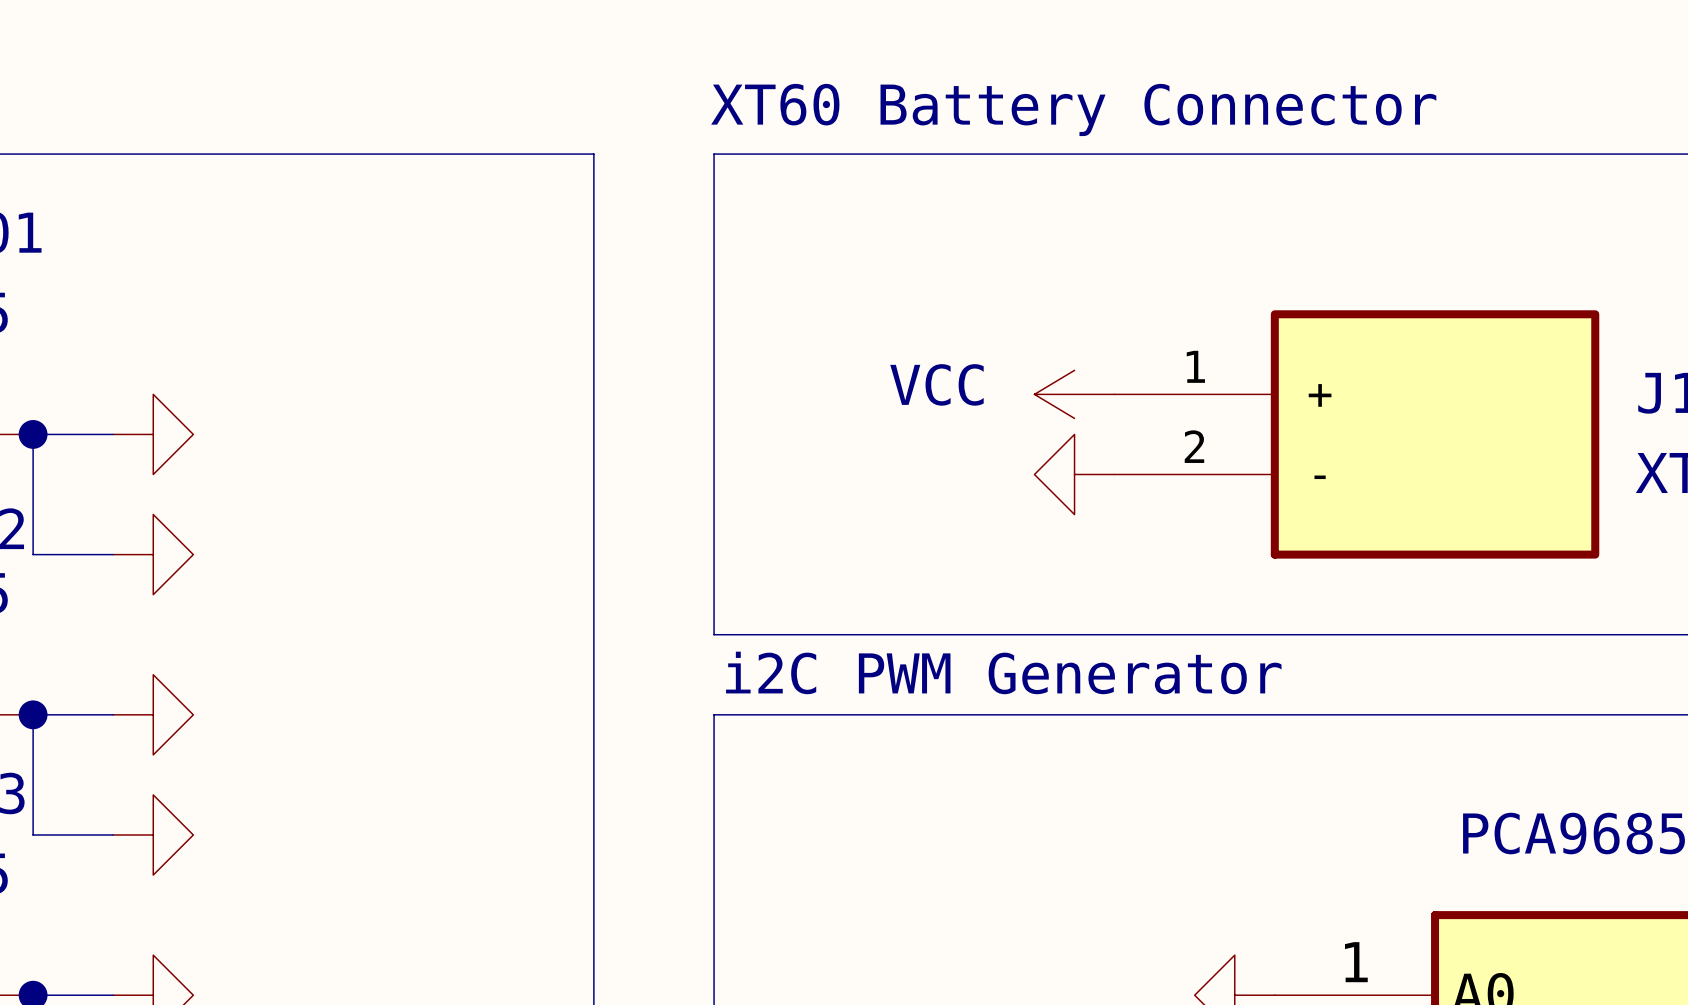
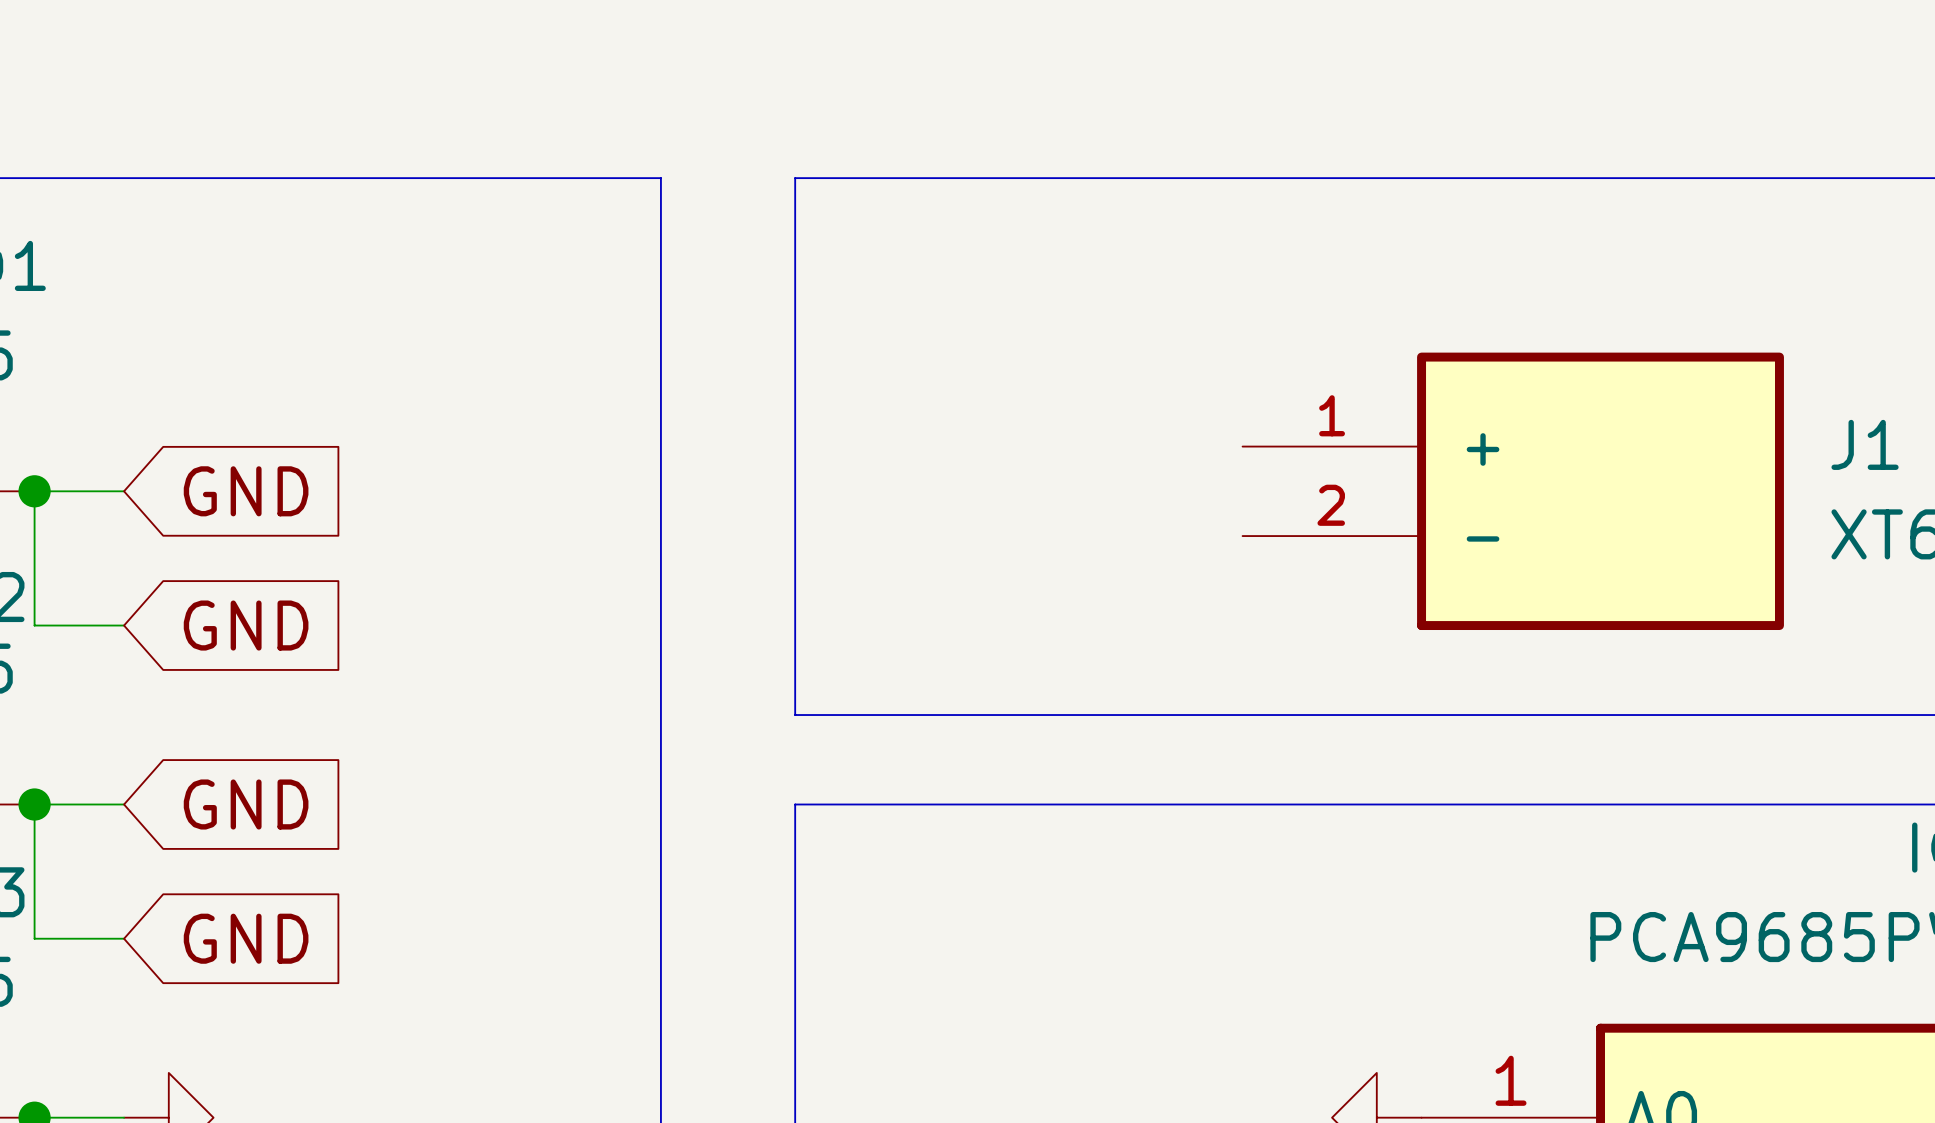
text: XT60 Battery Connector (1073, 109) -> none
power symbol: VCC (1074, 394) -> none
power symbol: (153, 434) -> none
global label: none -> GND (246, 491)
power symbol: (1074, 474) -> none
power symbol: (153, 554) -> none
global label: none -> GND (246, 625)
text: i2C PWM Generator (1003, 672) -> none
power symbol: (153, 714) -> none
global label: none -> GND (246, 804)
power symbol: (153, 834) -> none
global label: none -> GND (246, 938)

